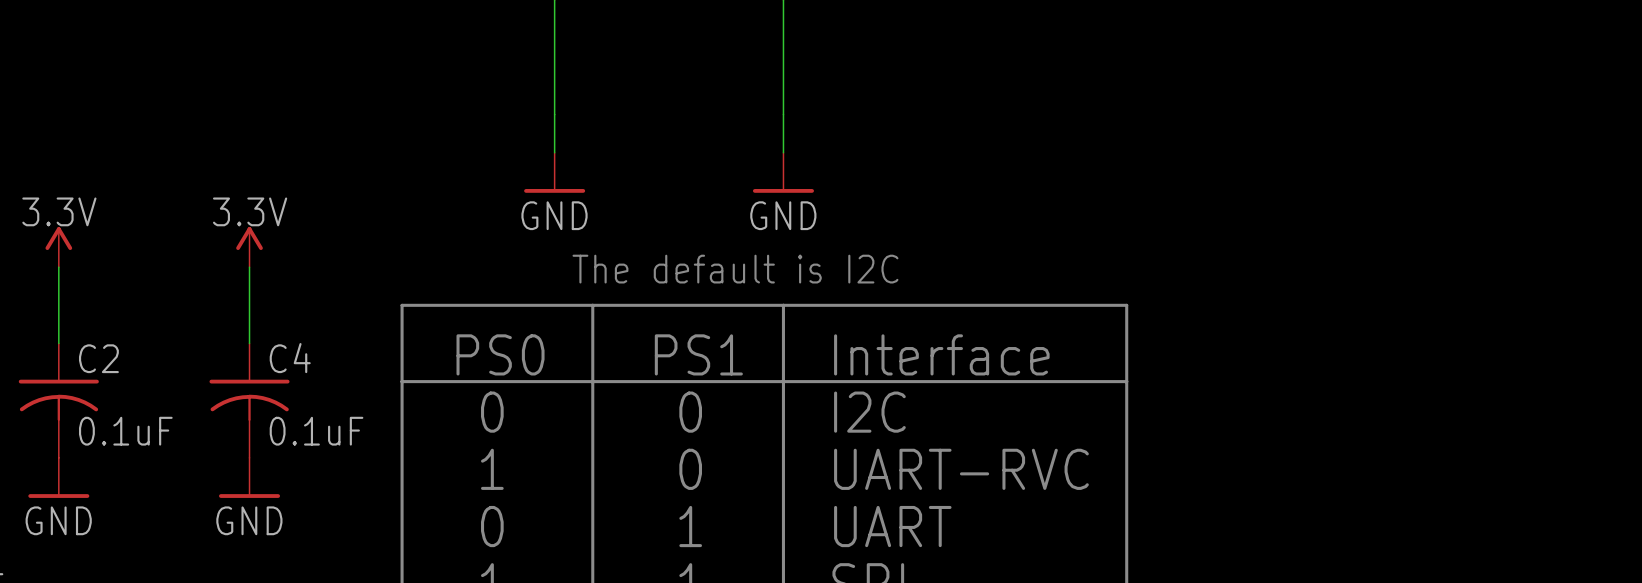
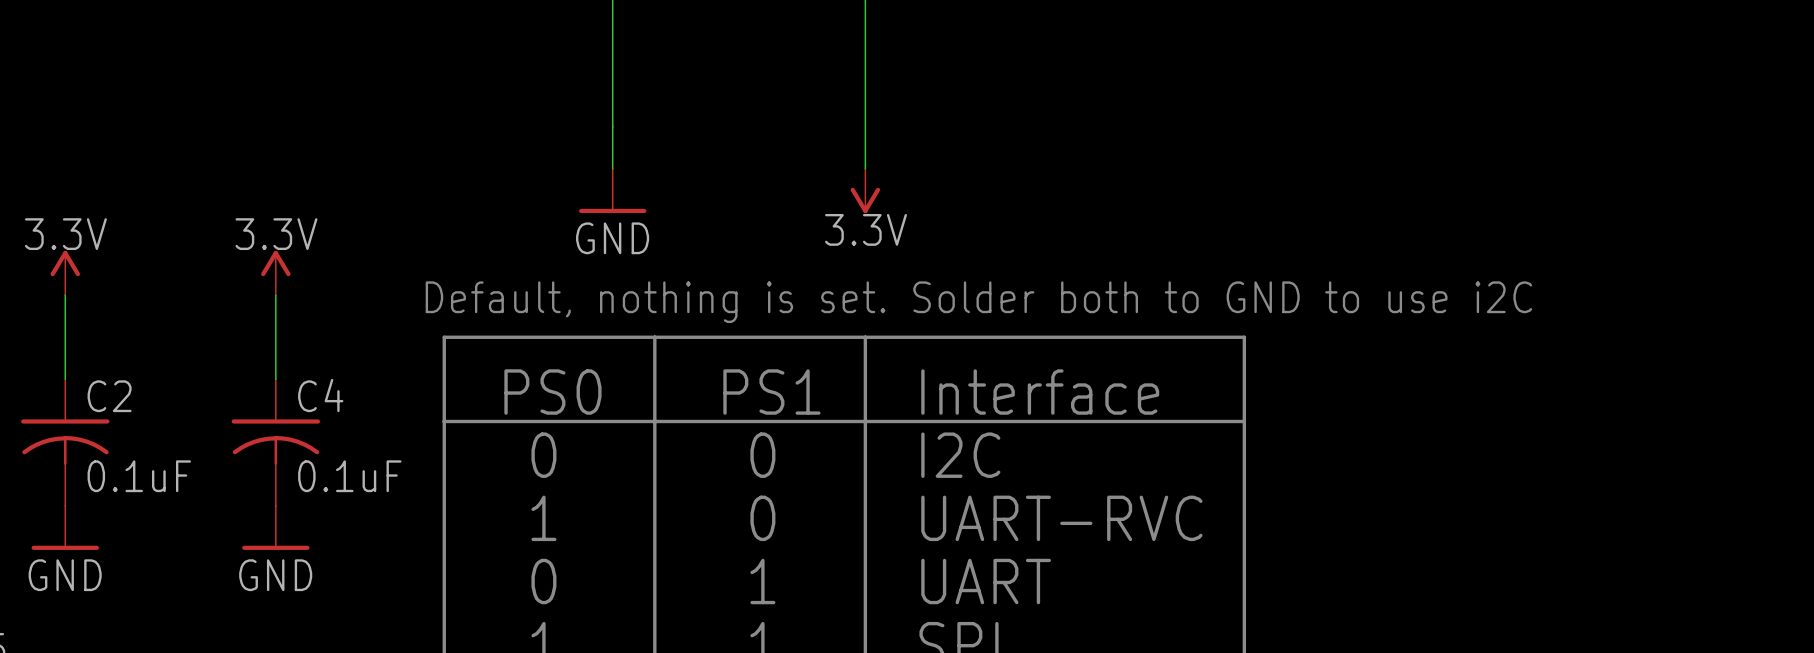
power symbol: GND (783, 172) -> 3.3V (865, 190)
text: The default is I2C (735, 269) -> none
text: none -> Default, nothing is set. Solder both to GND to use i2C (978, 302)

